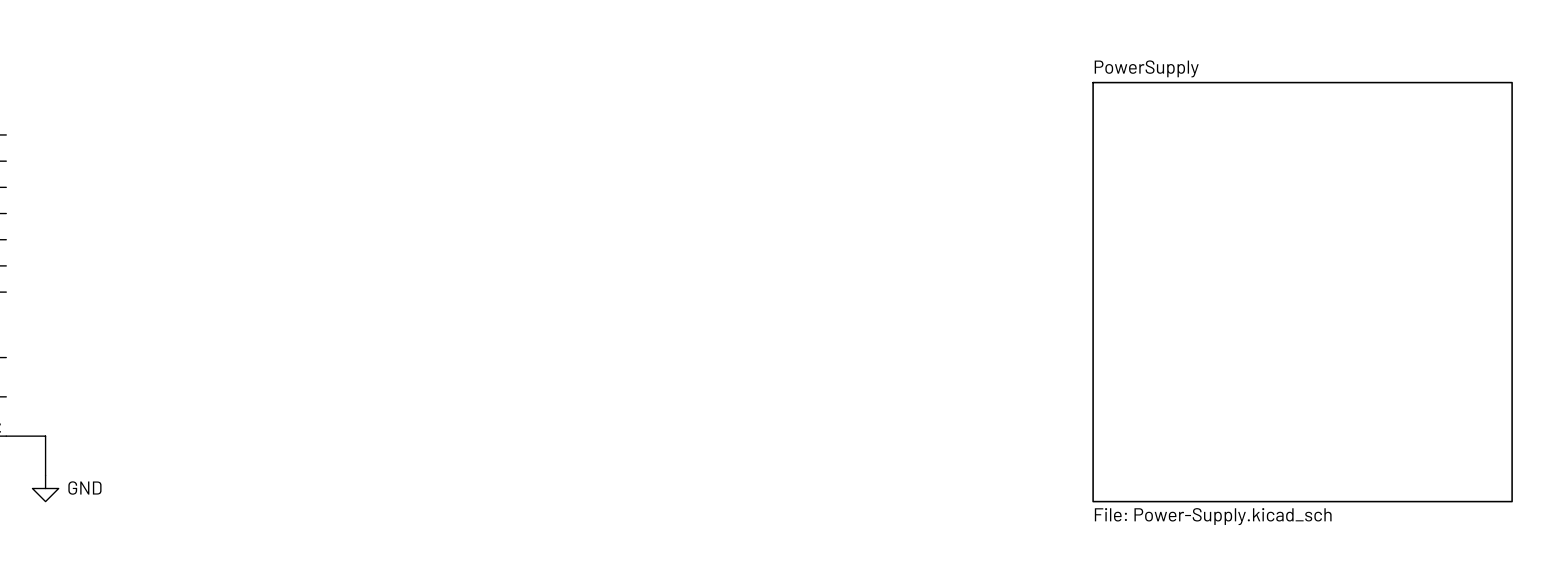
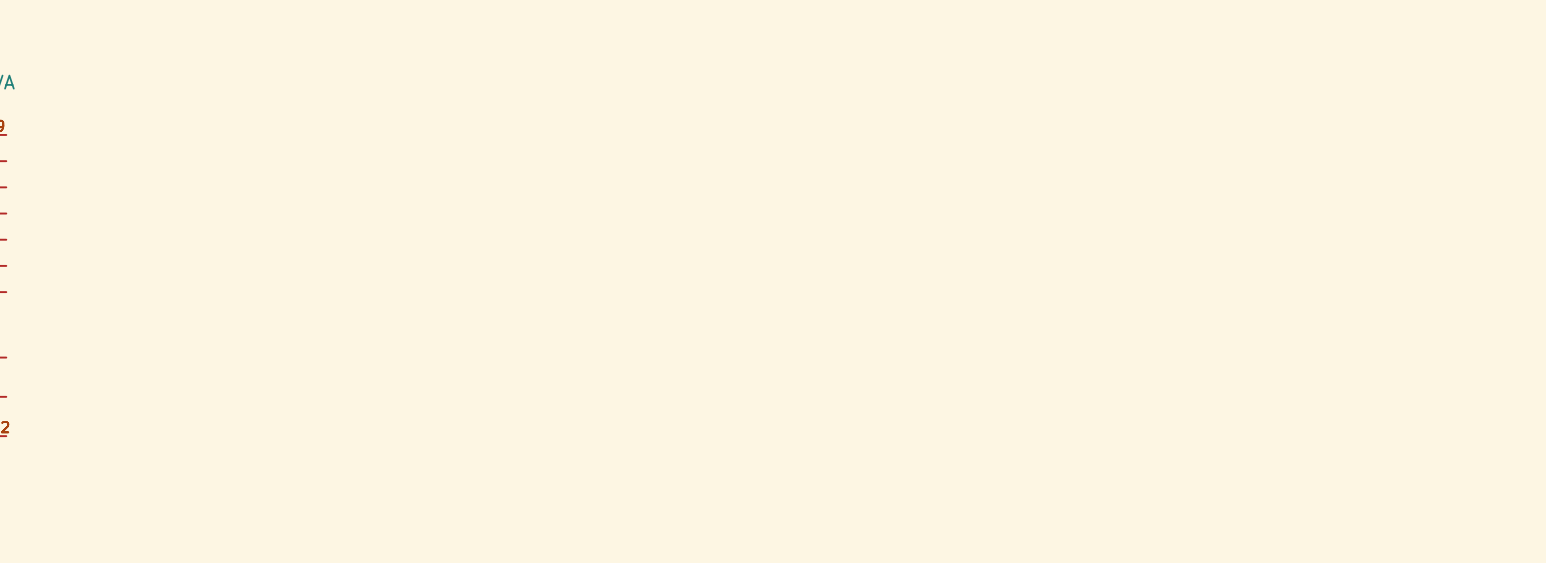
sheet PowerSupply: File: Power-Supply.kicad_sch (1302, 292) -> none
wire: (6, 436) (45, 436) (45, 475) -> none
power symbol: GND (45, 488) -> none

